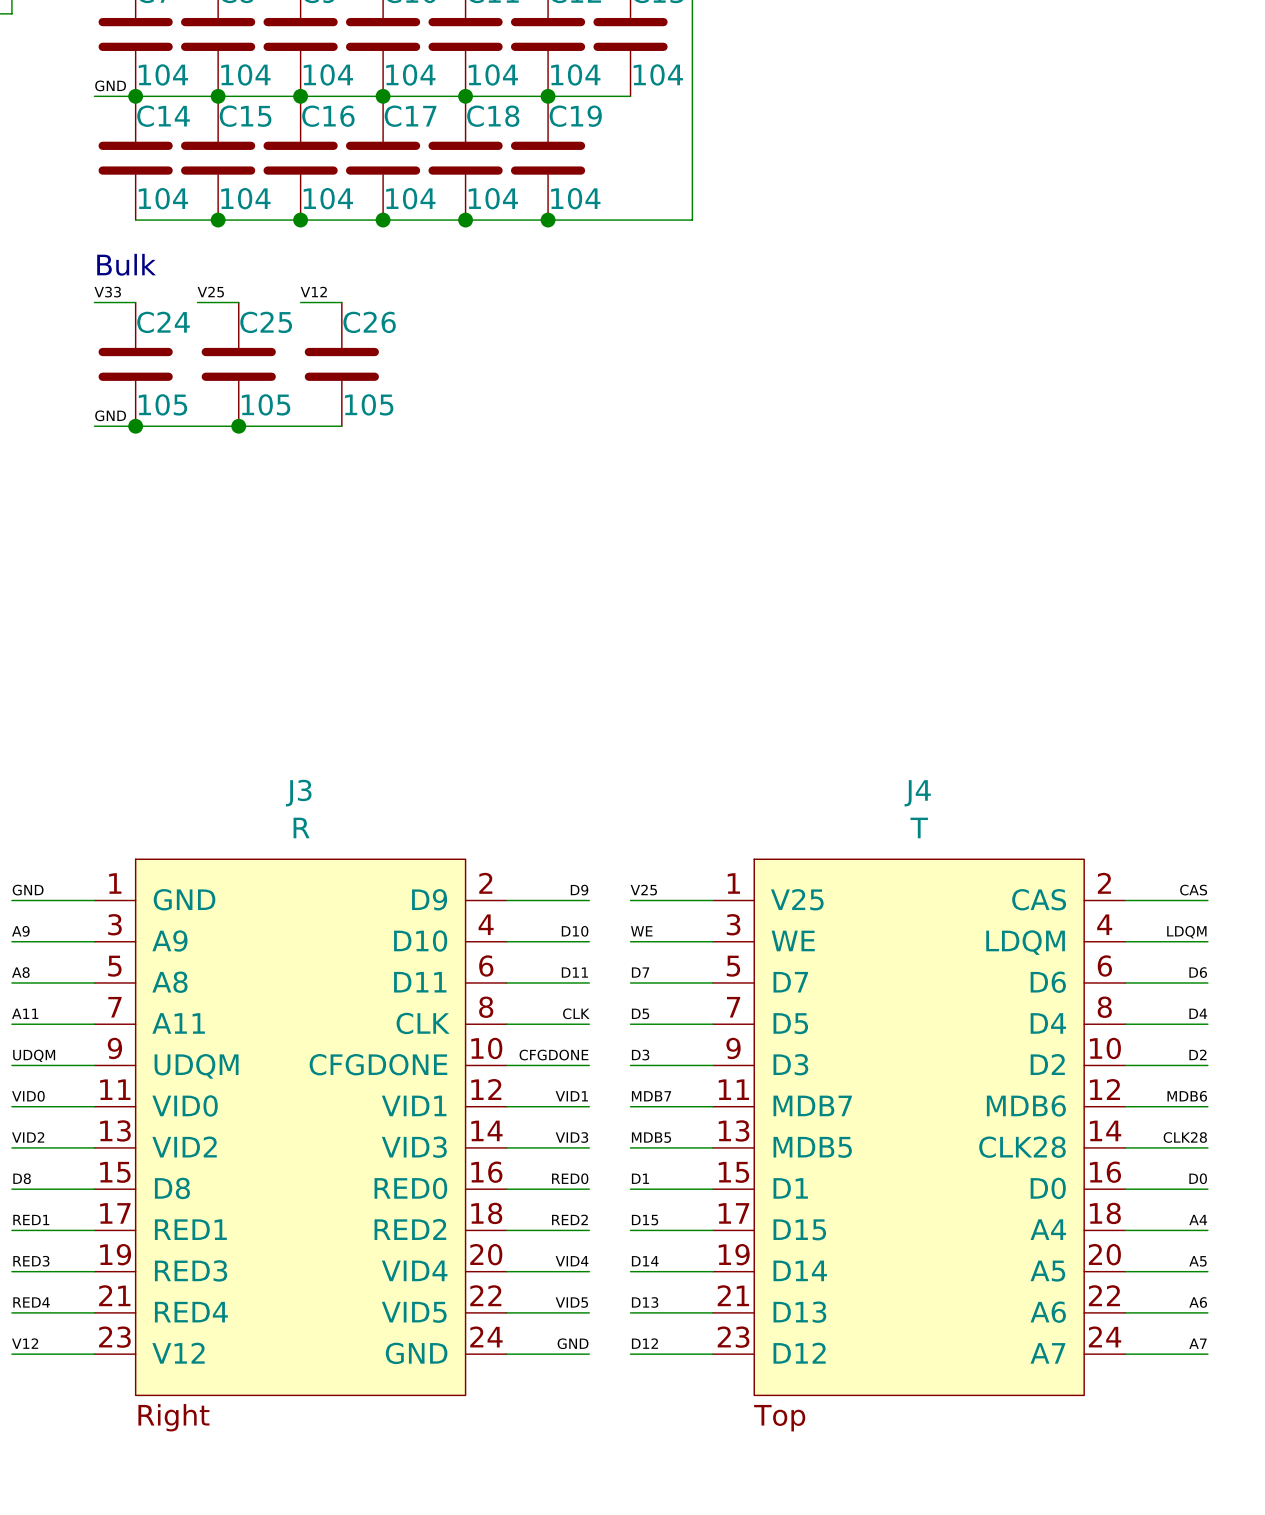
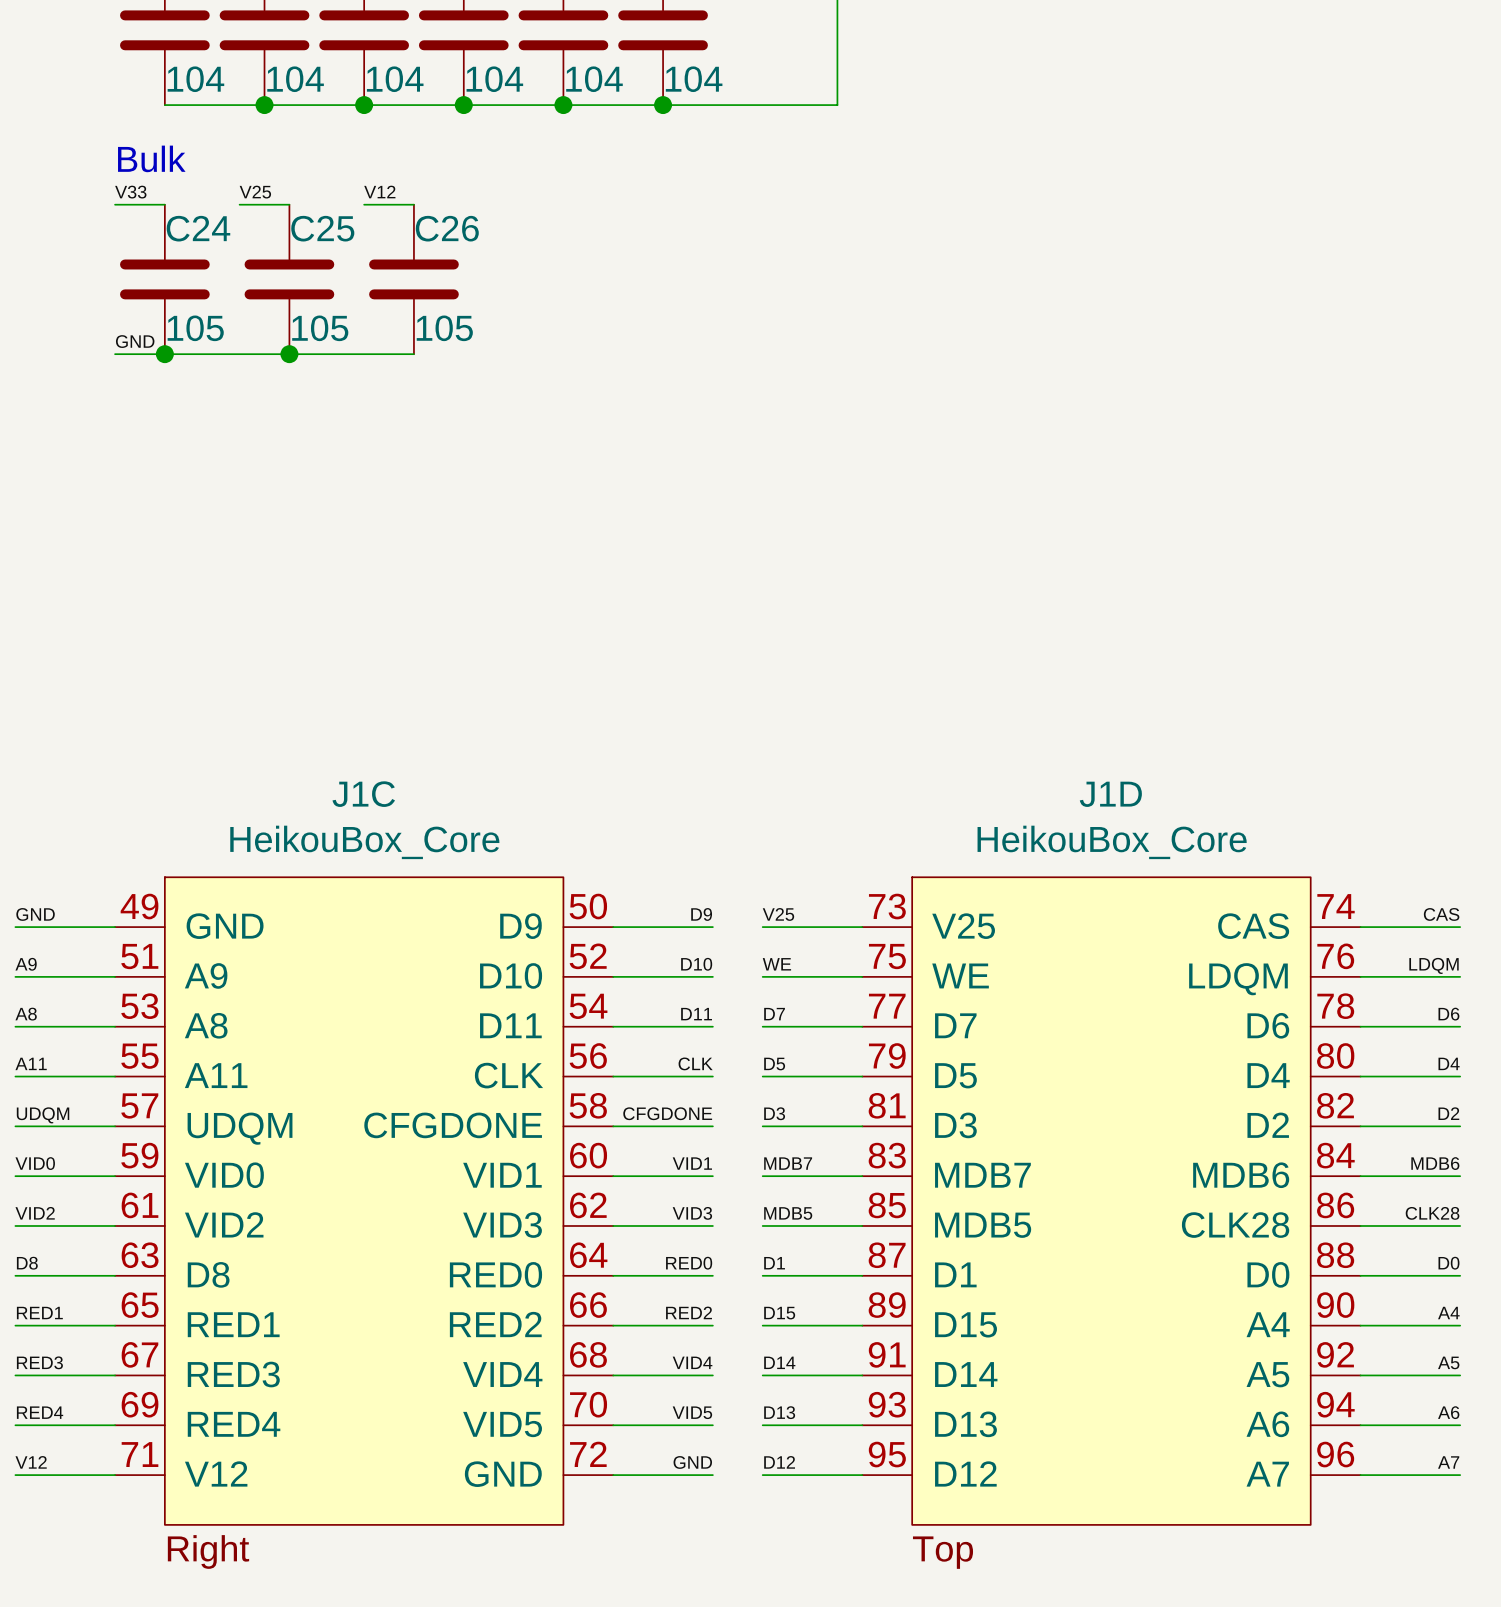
J3 name: J3 (298, 793) -> J1C (363, 794)
J4 name: J4 (917, 793) -> J1D (1110, 794)
J3 value: R (301, 827) -> HeikouBox_Core (364, 842)
J4 value: T (919, 827) -> HeikouBox_Core (1112, 842)
J3 symbol: [94, 859, 507, 1396] -> [115, 877, 614, 1525]
J4 symbol: [713, 859, 1126, 1396] -> [862, 877, 1361, 1525]

